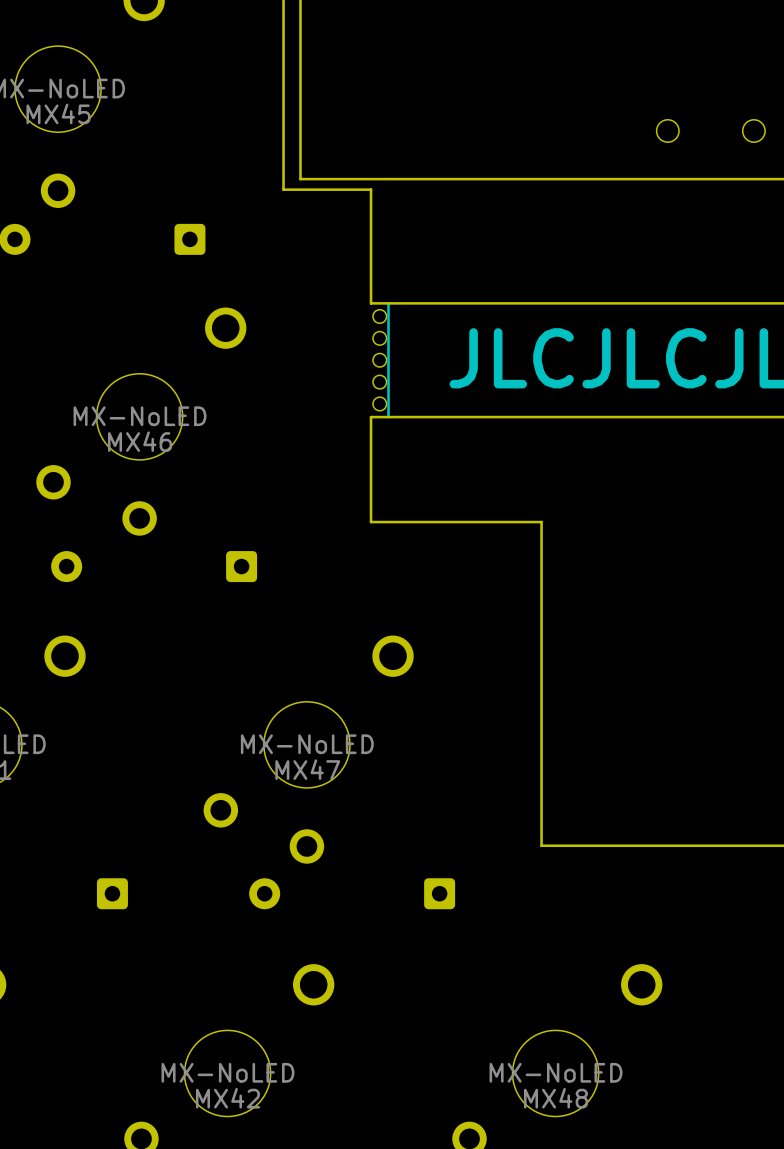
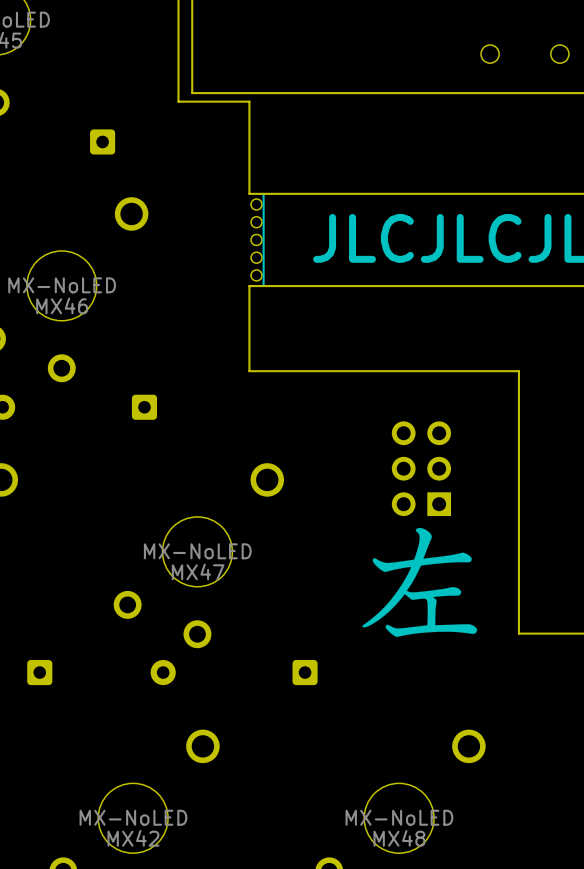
board edge: (541, 522) (541, 845) (703, 845) -> (387, 371) (518, 371) (518, 633)
part: none -> (421, 468)
drawing: none -> [362, 527, 478, 637]

